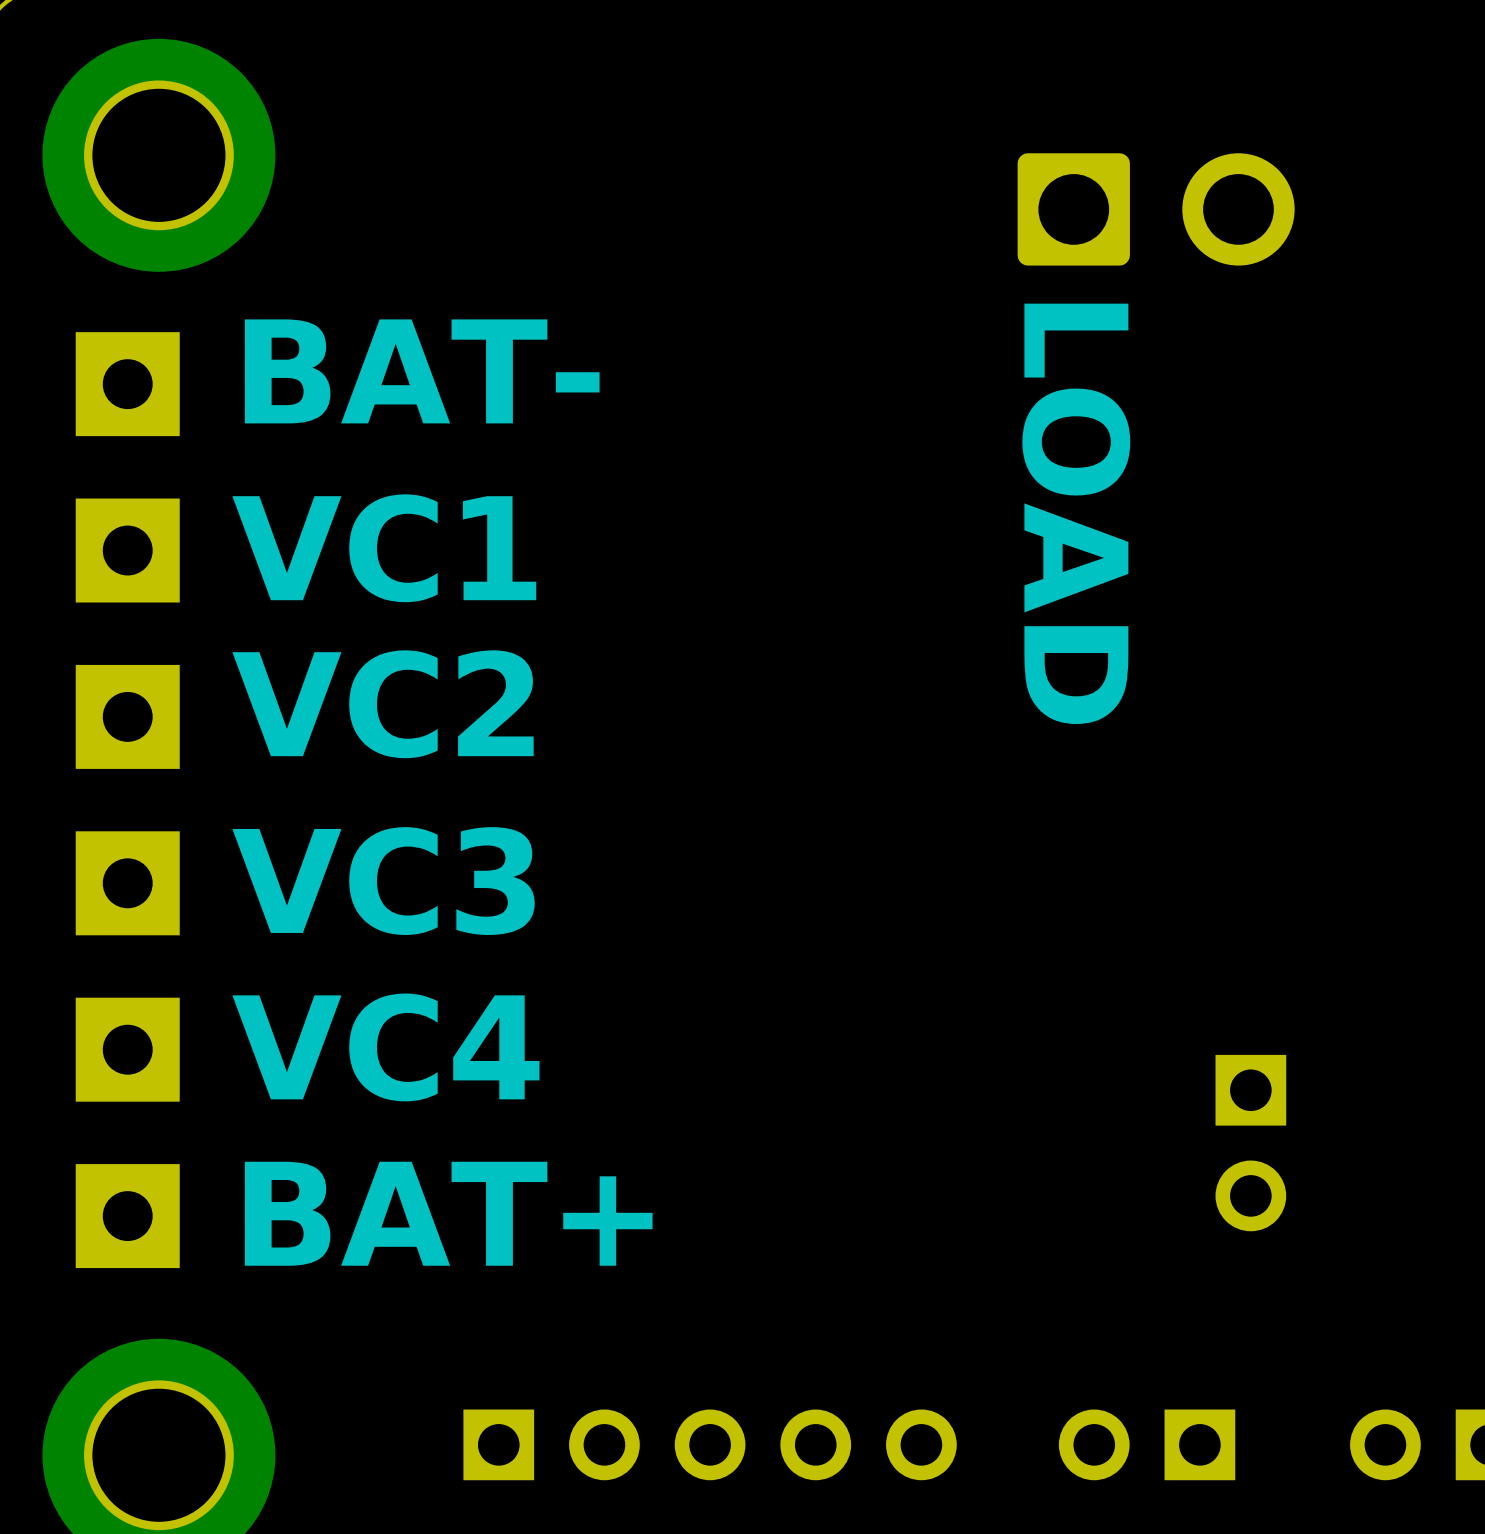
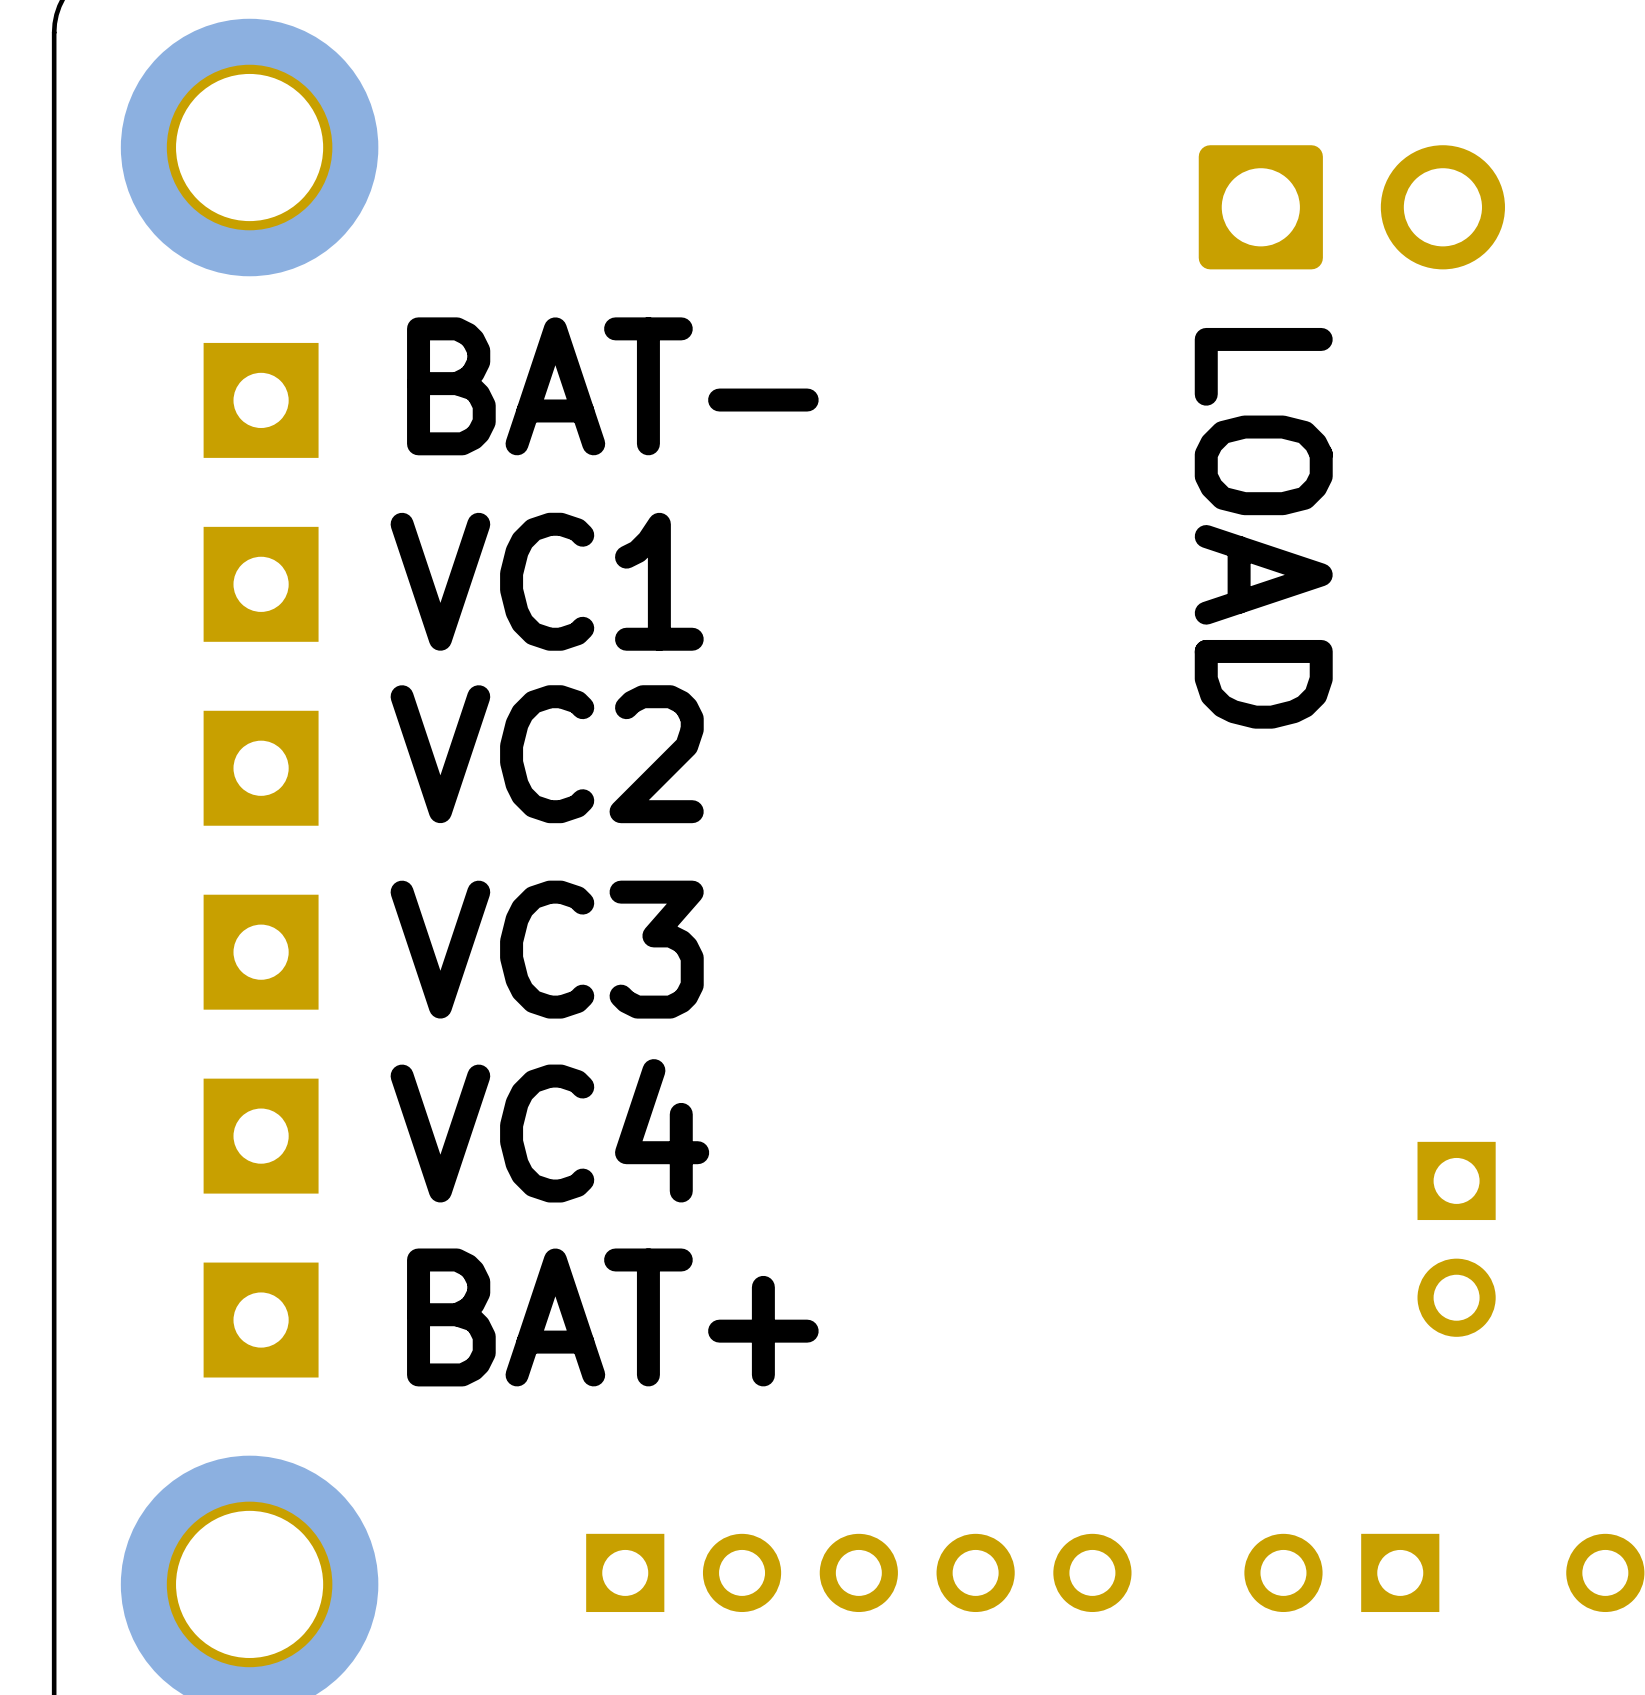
text position: BAT- (422, 371) -> BAT- (612, 386)
part position: (127, 384) -> (261, 400)
text position: VC1 (384, 548) -> VC1 (547, 581)
part position: (127, 550) -> (261, 584)
text position: VC2 (383, 704) -> VC2 (547, 754)
part position: (127, 716) -> (261, 768)
text position: VC3 (383, 881) -> VC3 (547, 949)
part position: (127, 883) -> (261, 952)
text position: VC4 (385, 1047) -> VC4 (549, 1130)
part position: (127, 1049) -> (261, 1136)
text position: BAT+ (448, 1213) -> BAT+ (612, 1317)
part position: (127, 1216) -> (261, 1320)

